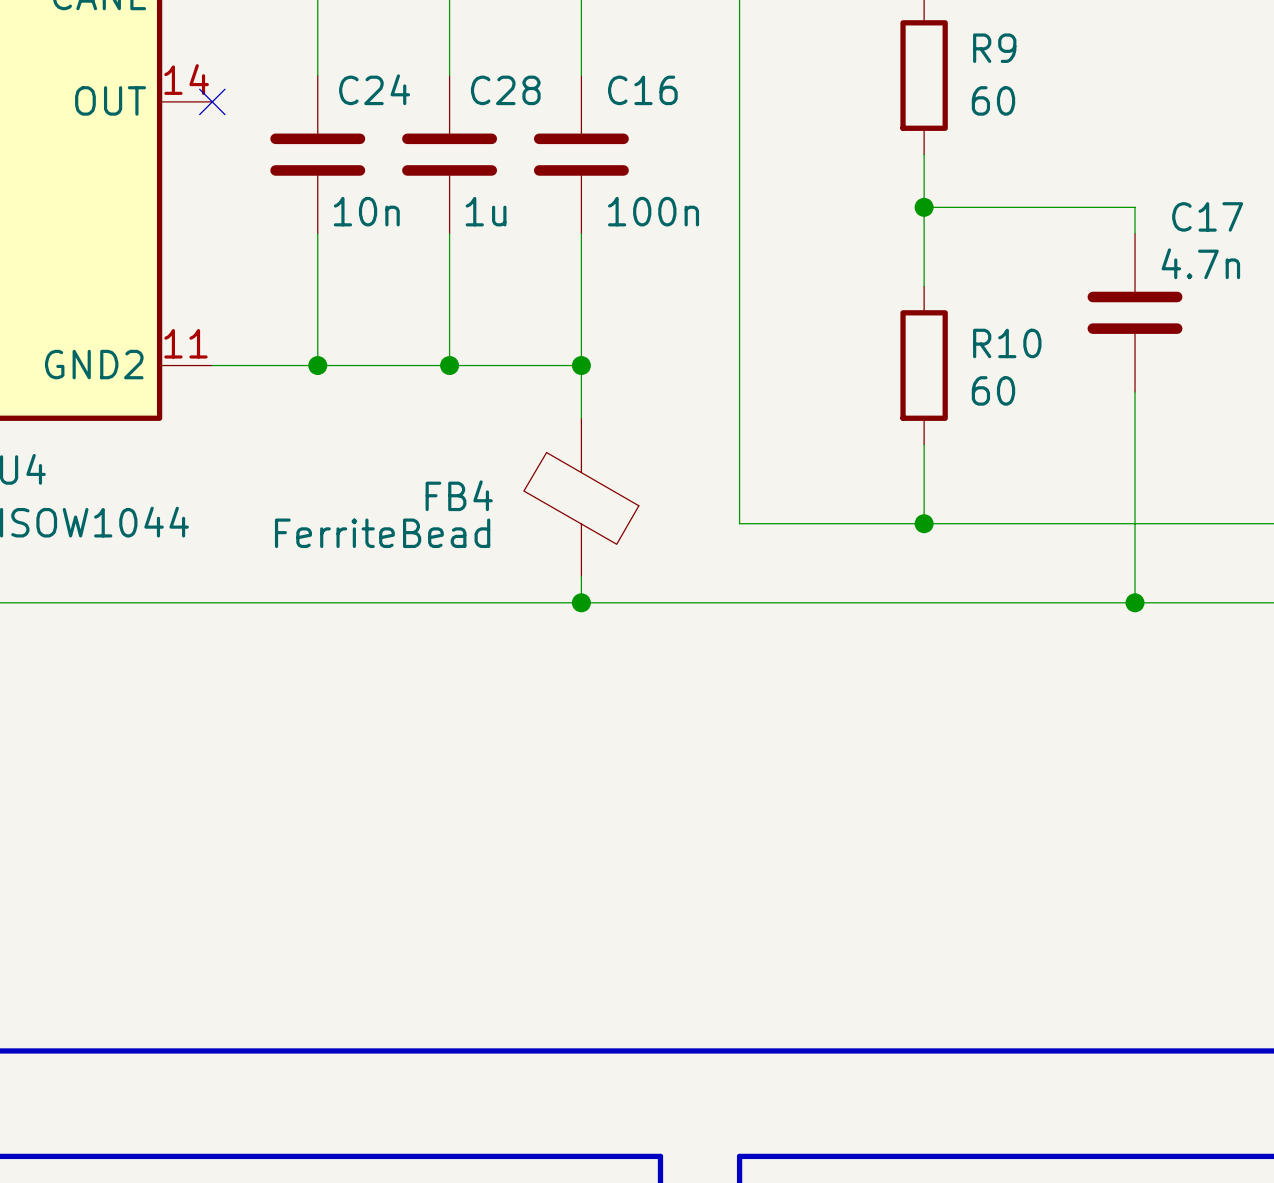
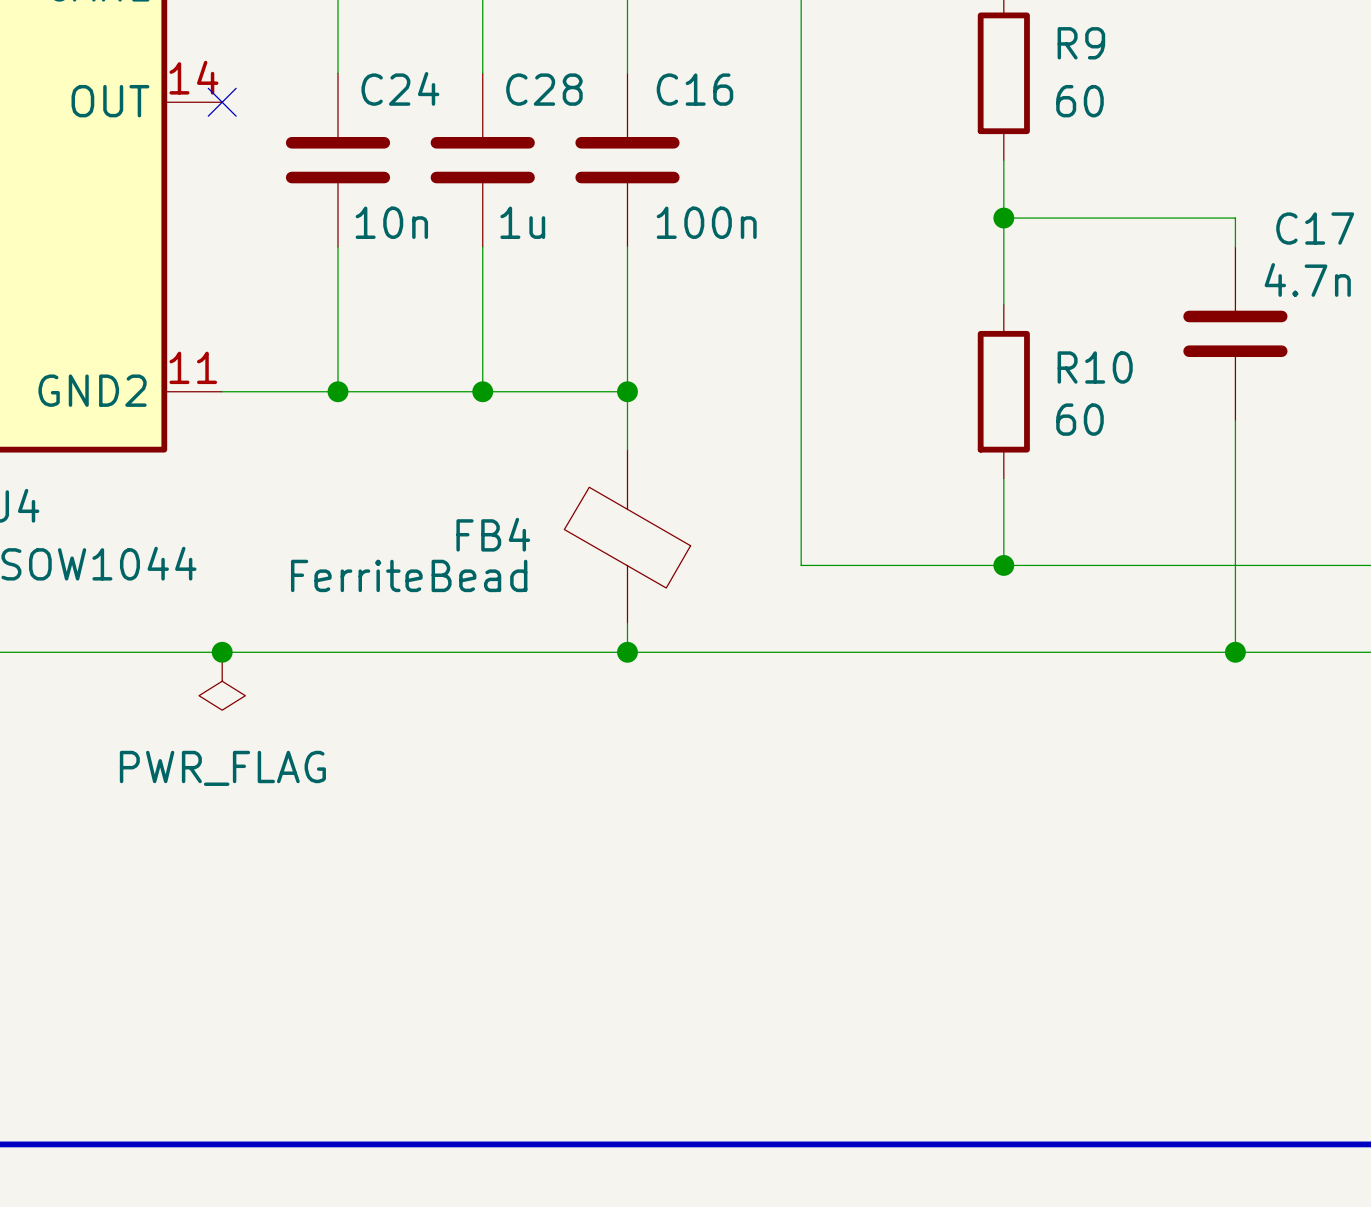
junction: none -> (222, 652)
power symbol: none -> PWR_FLAG (222, 681)

